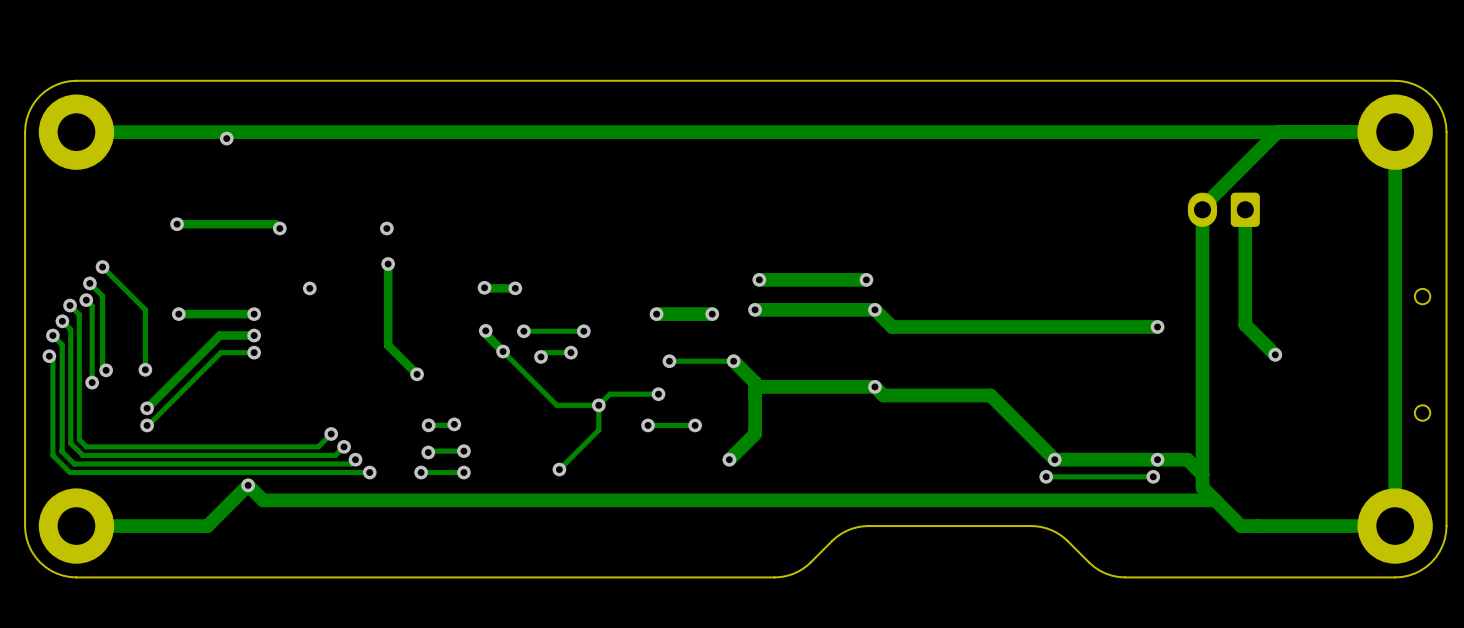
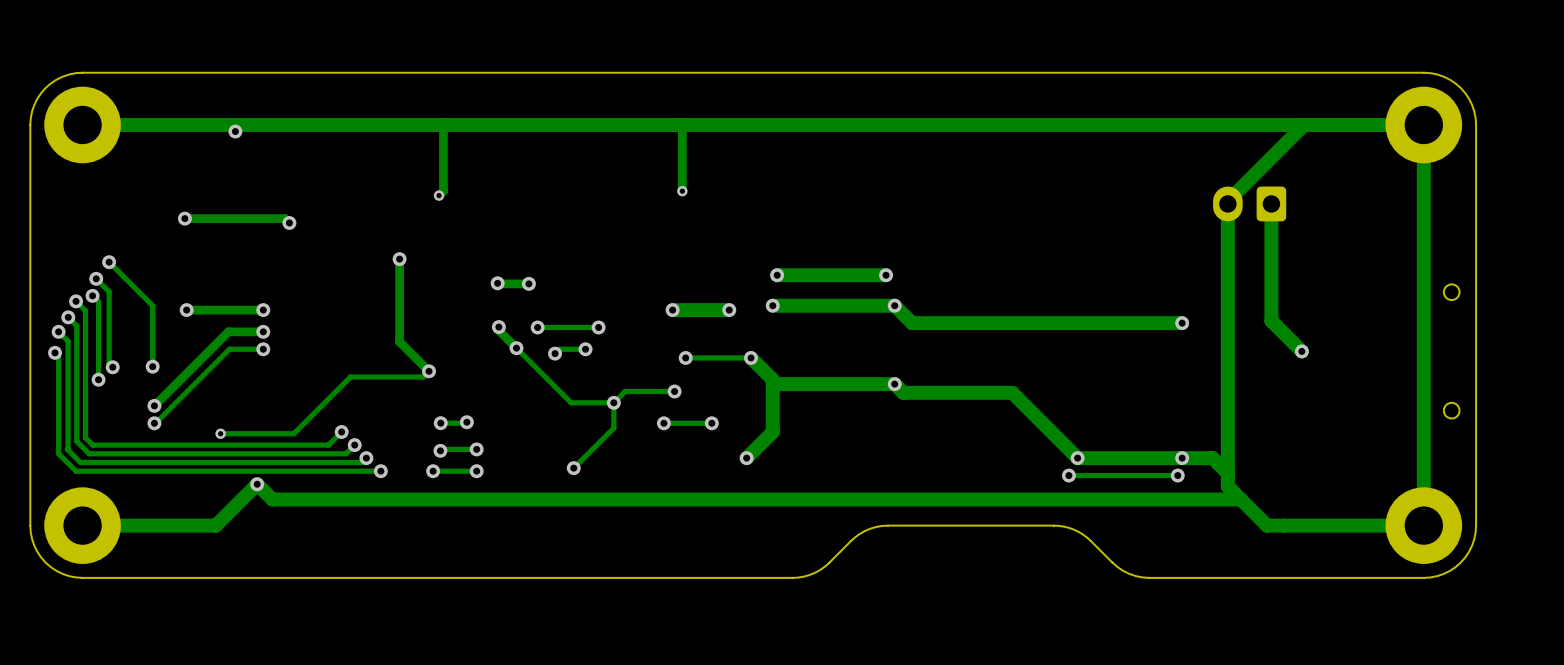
track: none -> (443, 124) (443, 191) (439, 195)
track: none -> (682, 124) (682, 191)
via: none -> (682, 191)
via: none -> (439, 195)
via: (386, 228) -> none
via: (309, 288) -> none
track: none -> (429, 371) (423, 377) (350, 377) (293, 433) (220, 433)
via: none -> (220, 433)

